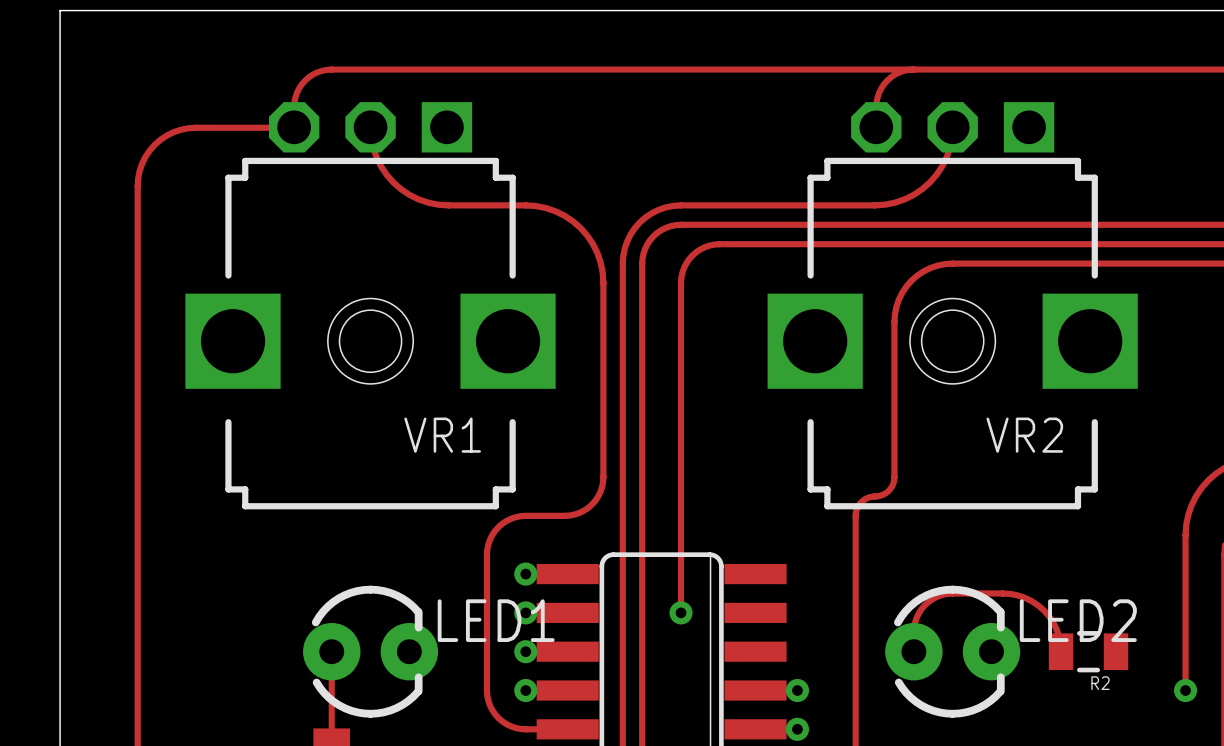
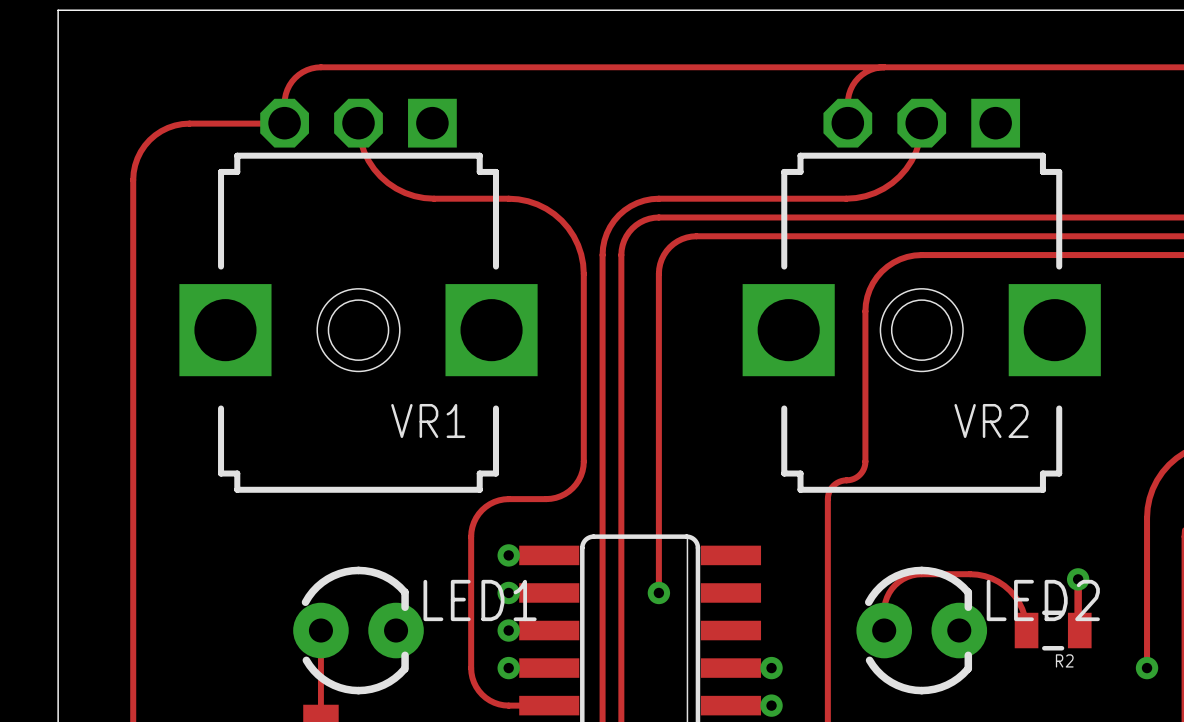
track: none -> (1078, 579) (1078, 628) (1079, 630)
via: none -> (1078, 579)

